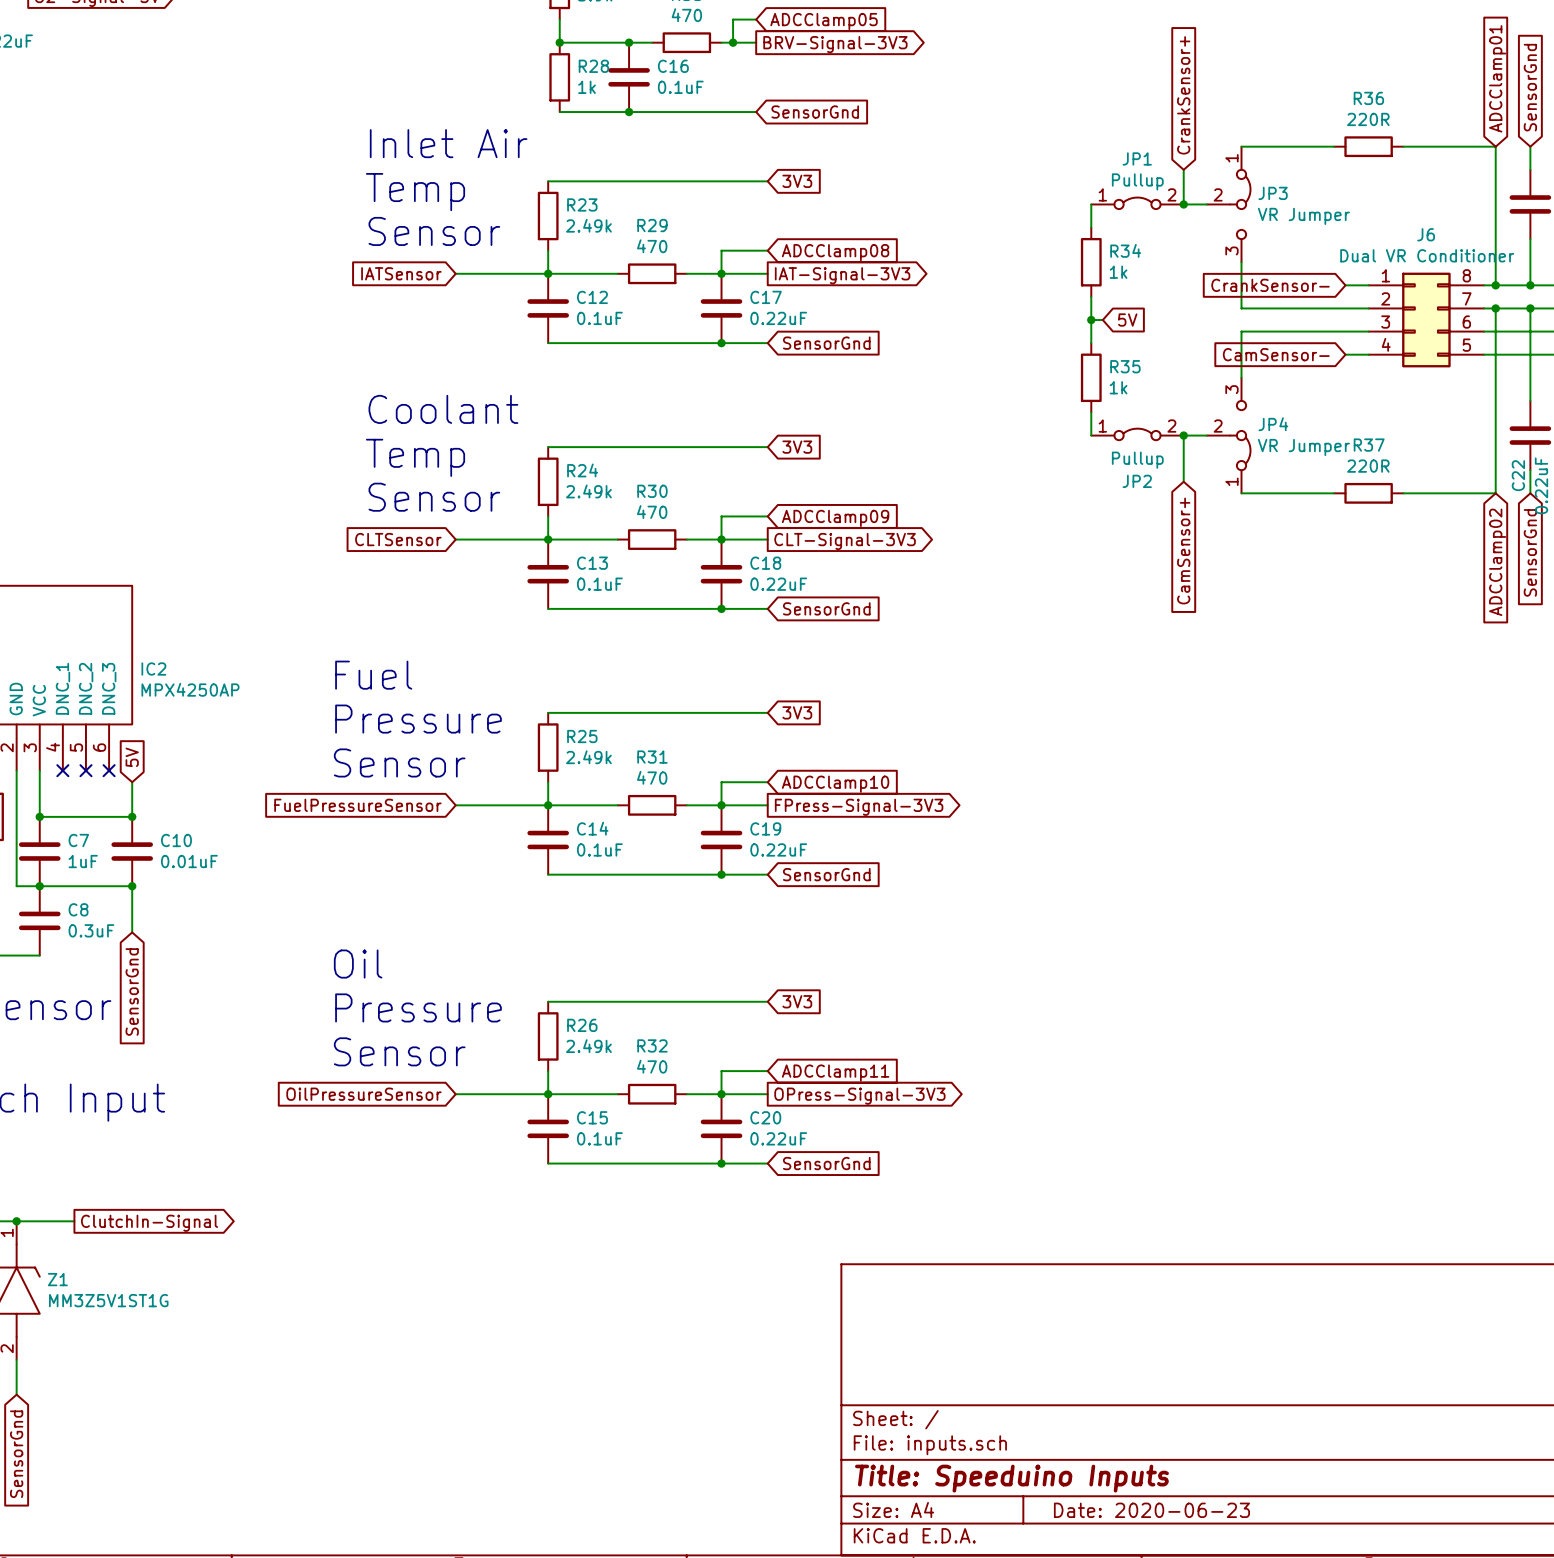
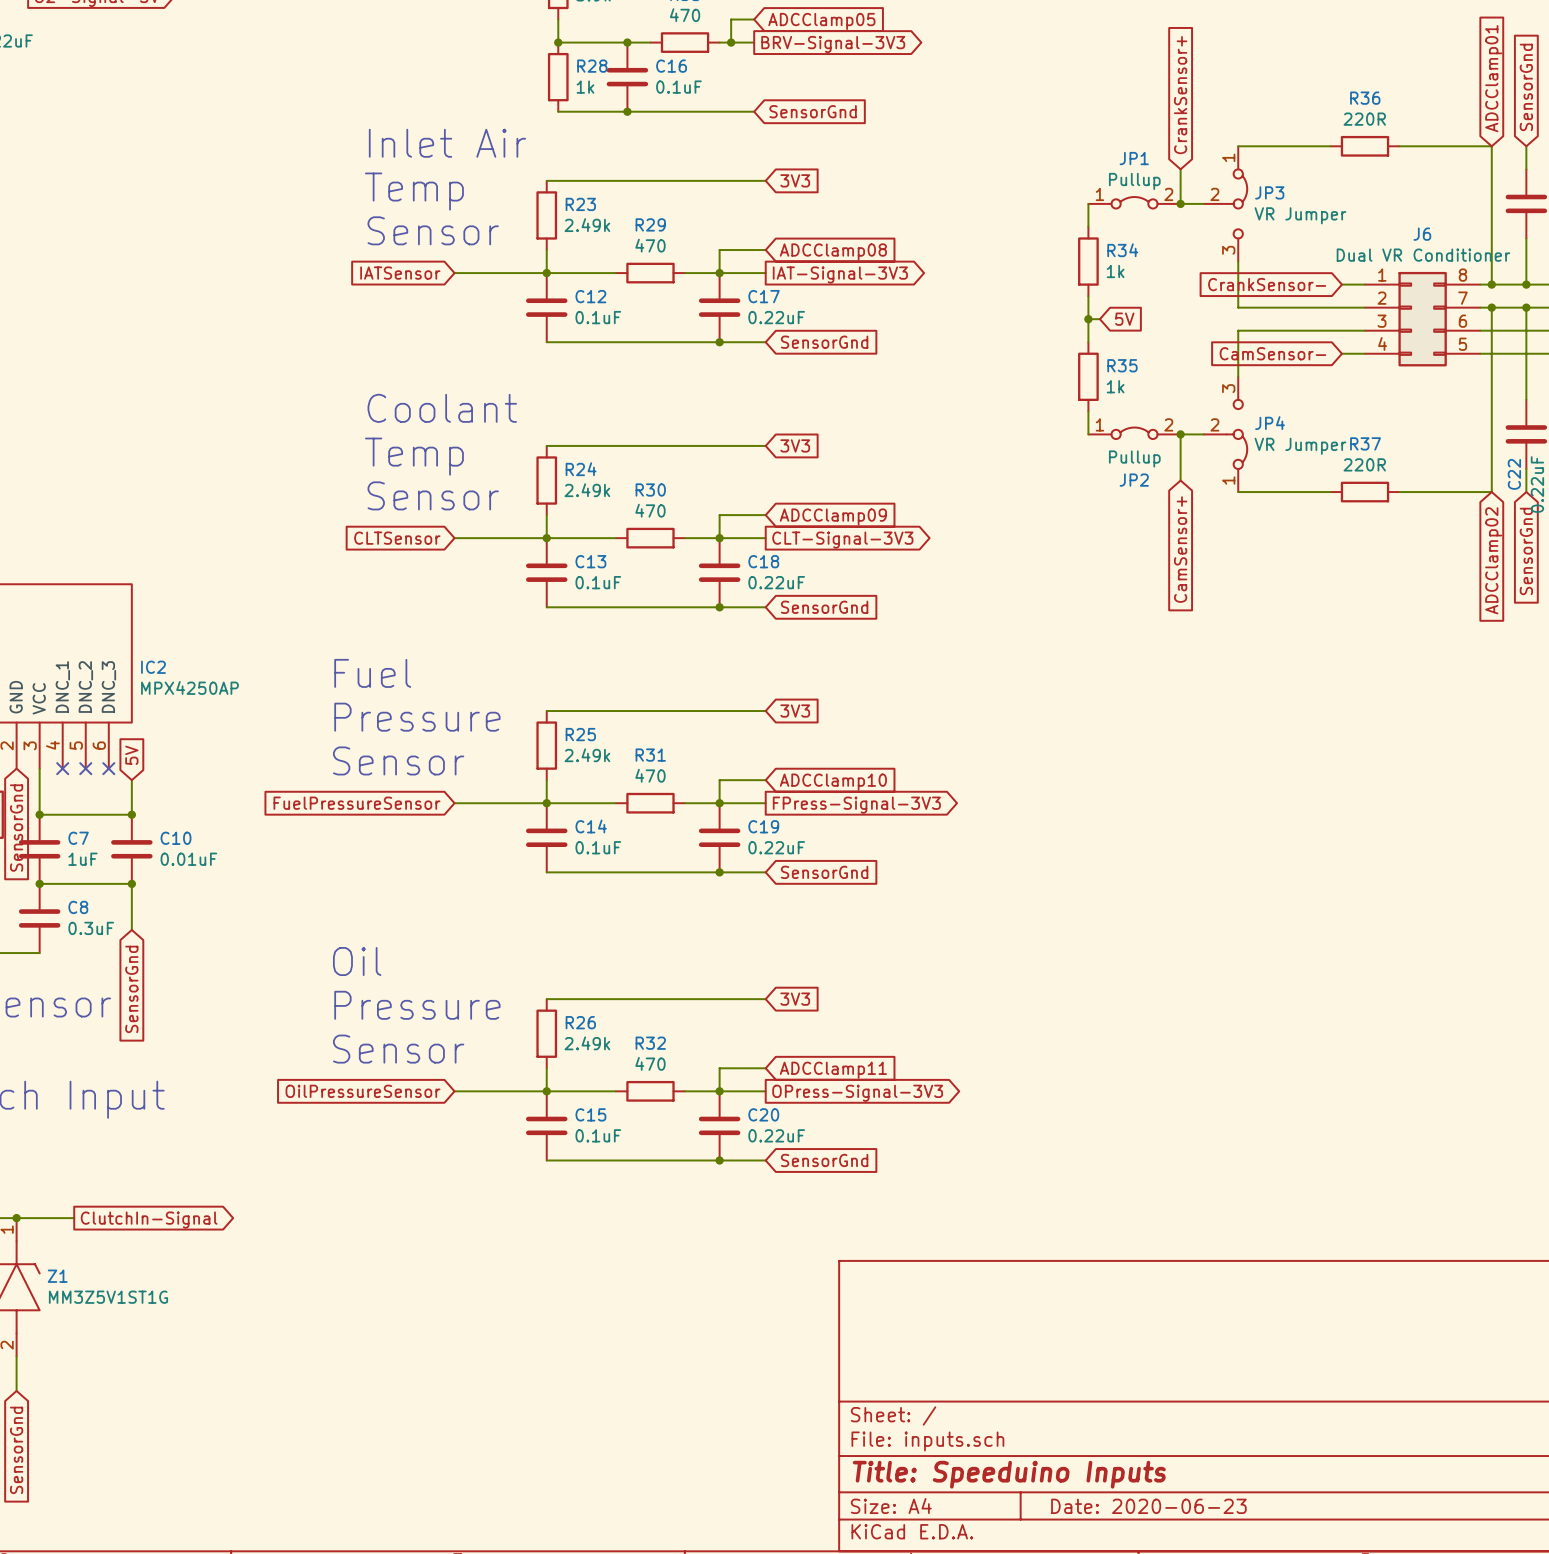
wire: (16, 770) (16, 886) (39, 886) -> none
global label: none -> SensorGnd (16, 828)

